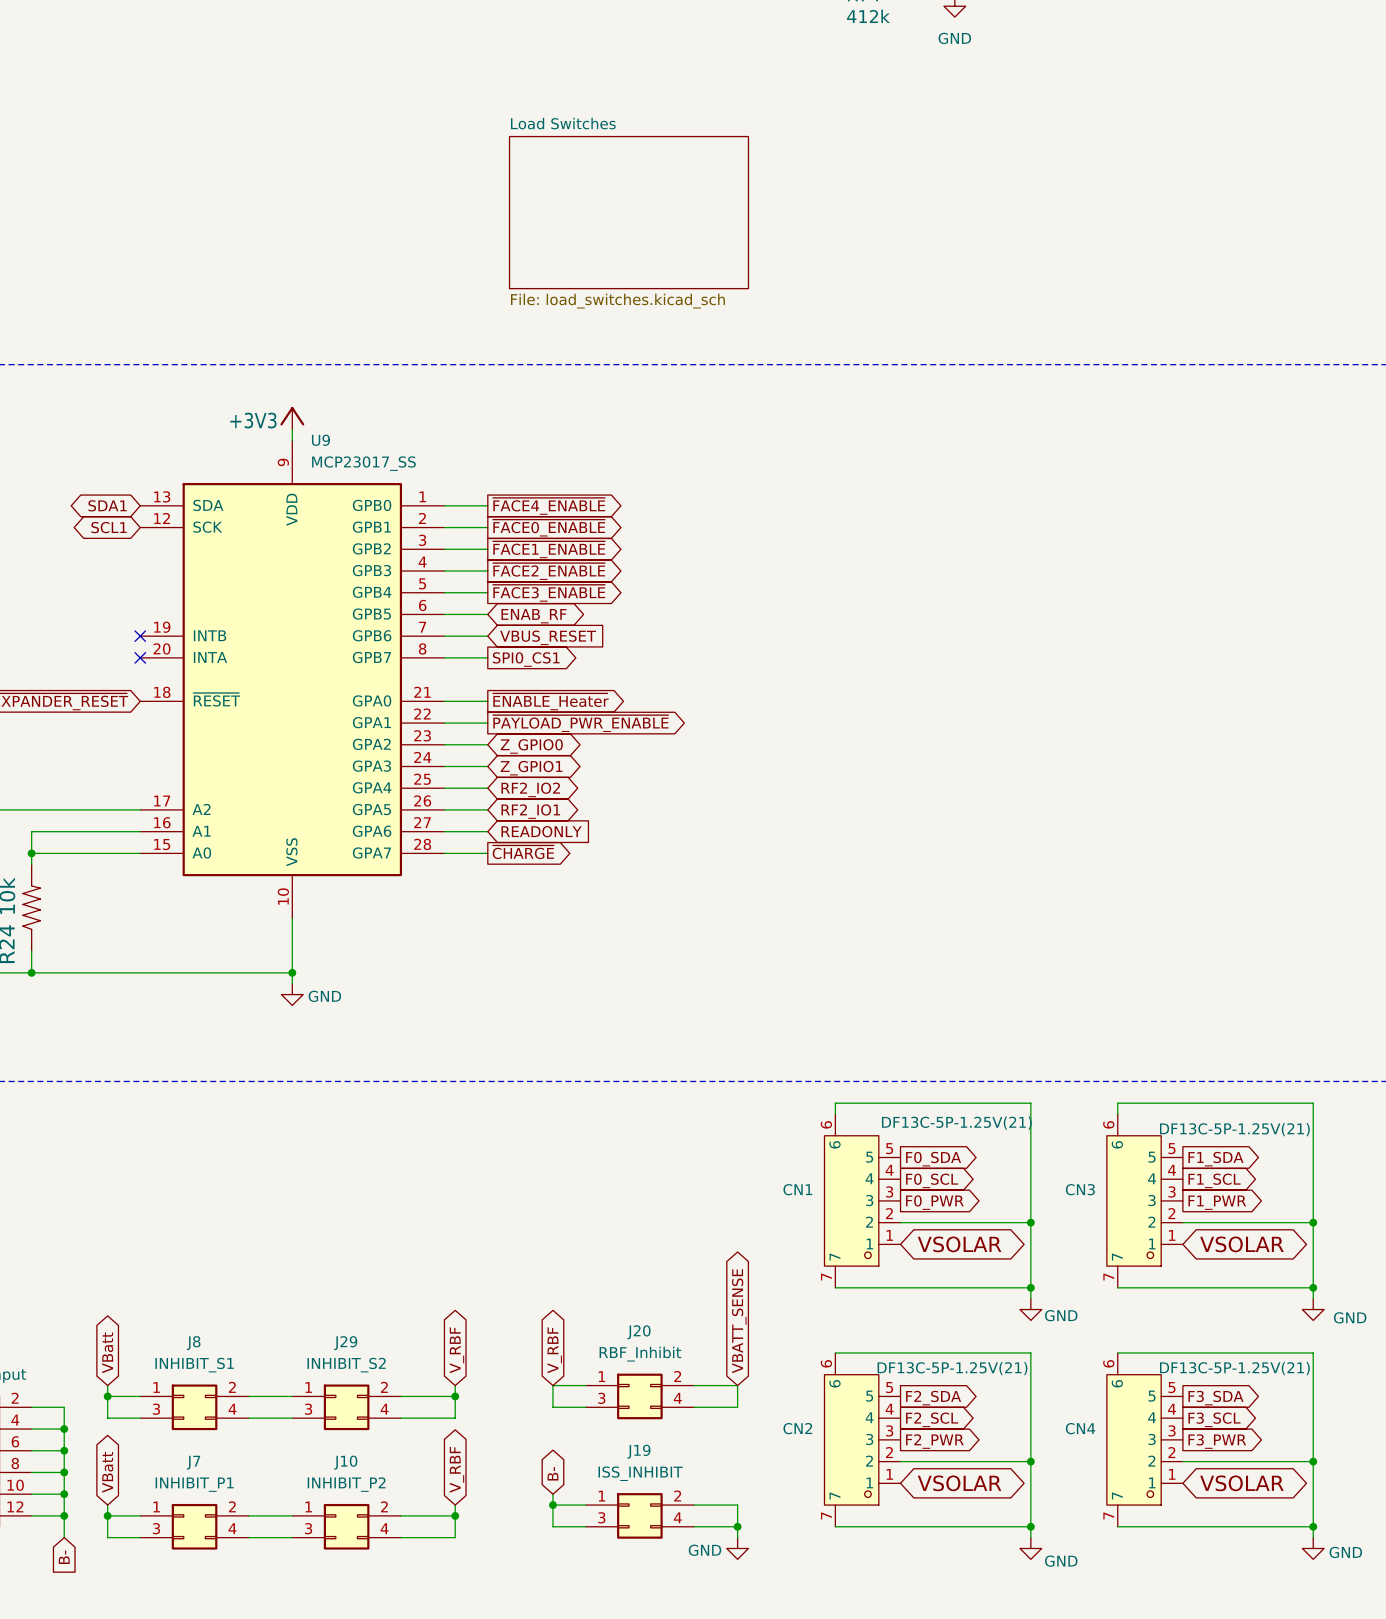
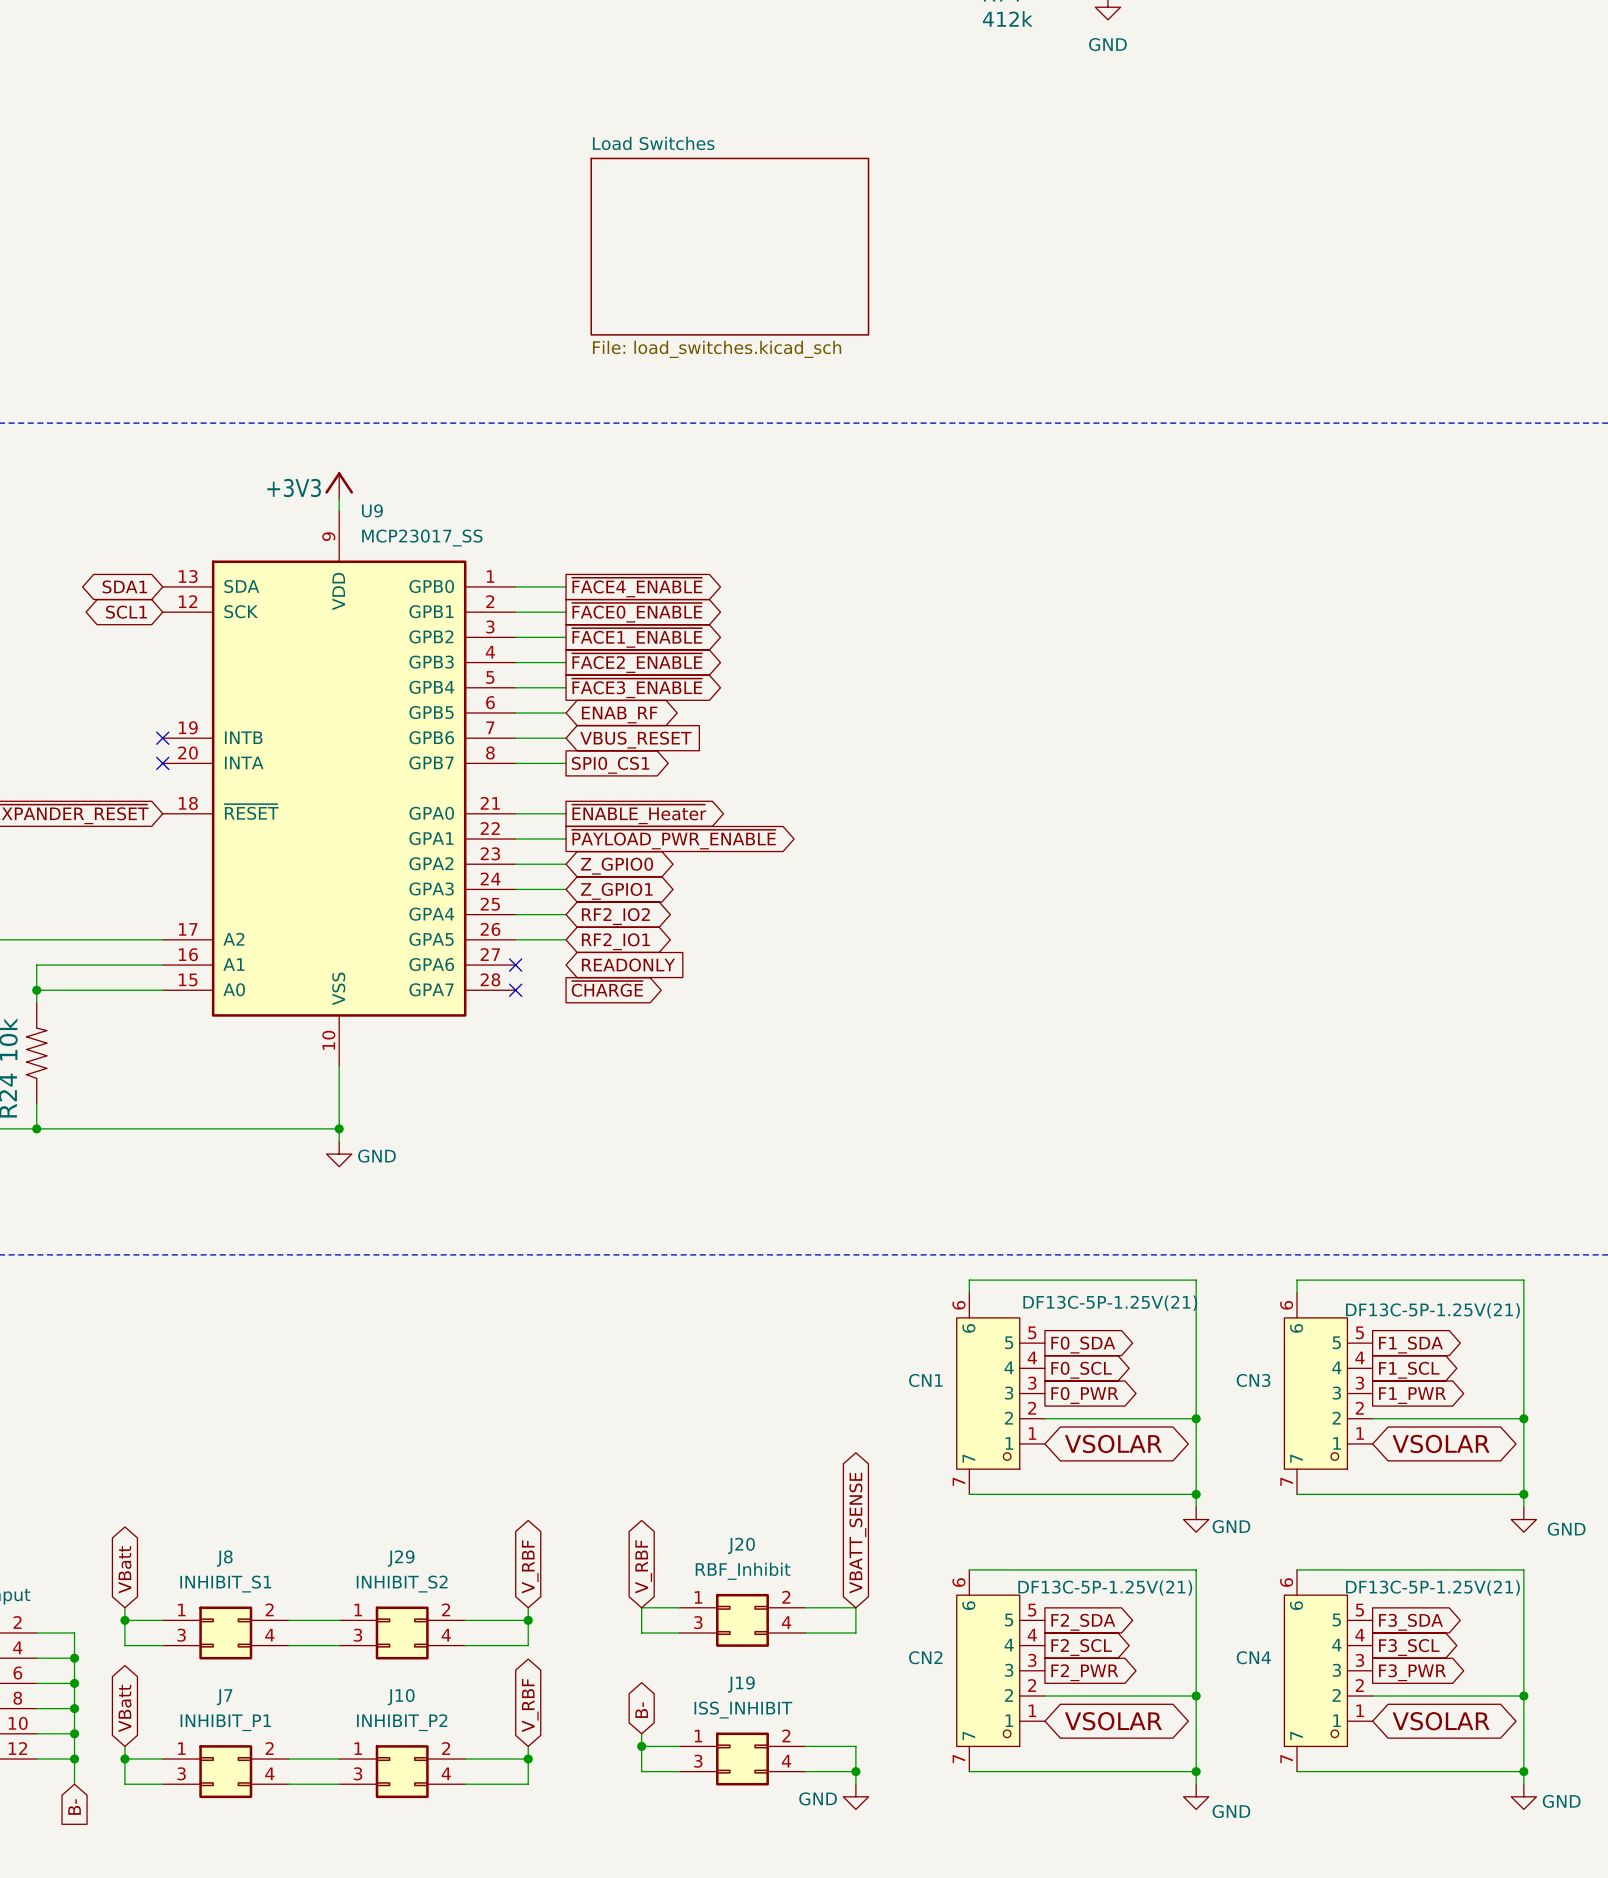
wire: (444, 831) (487, 831) -> none
no-connect mark: none -> (515, 965)
wire: (444, 853) (487, 853) -> none
no-connect mark: none -> (515, 990)

